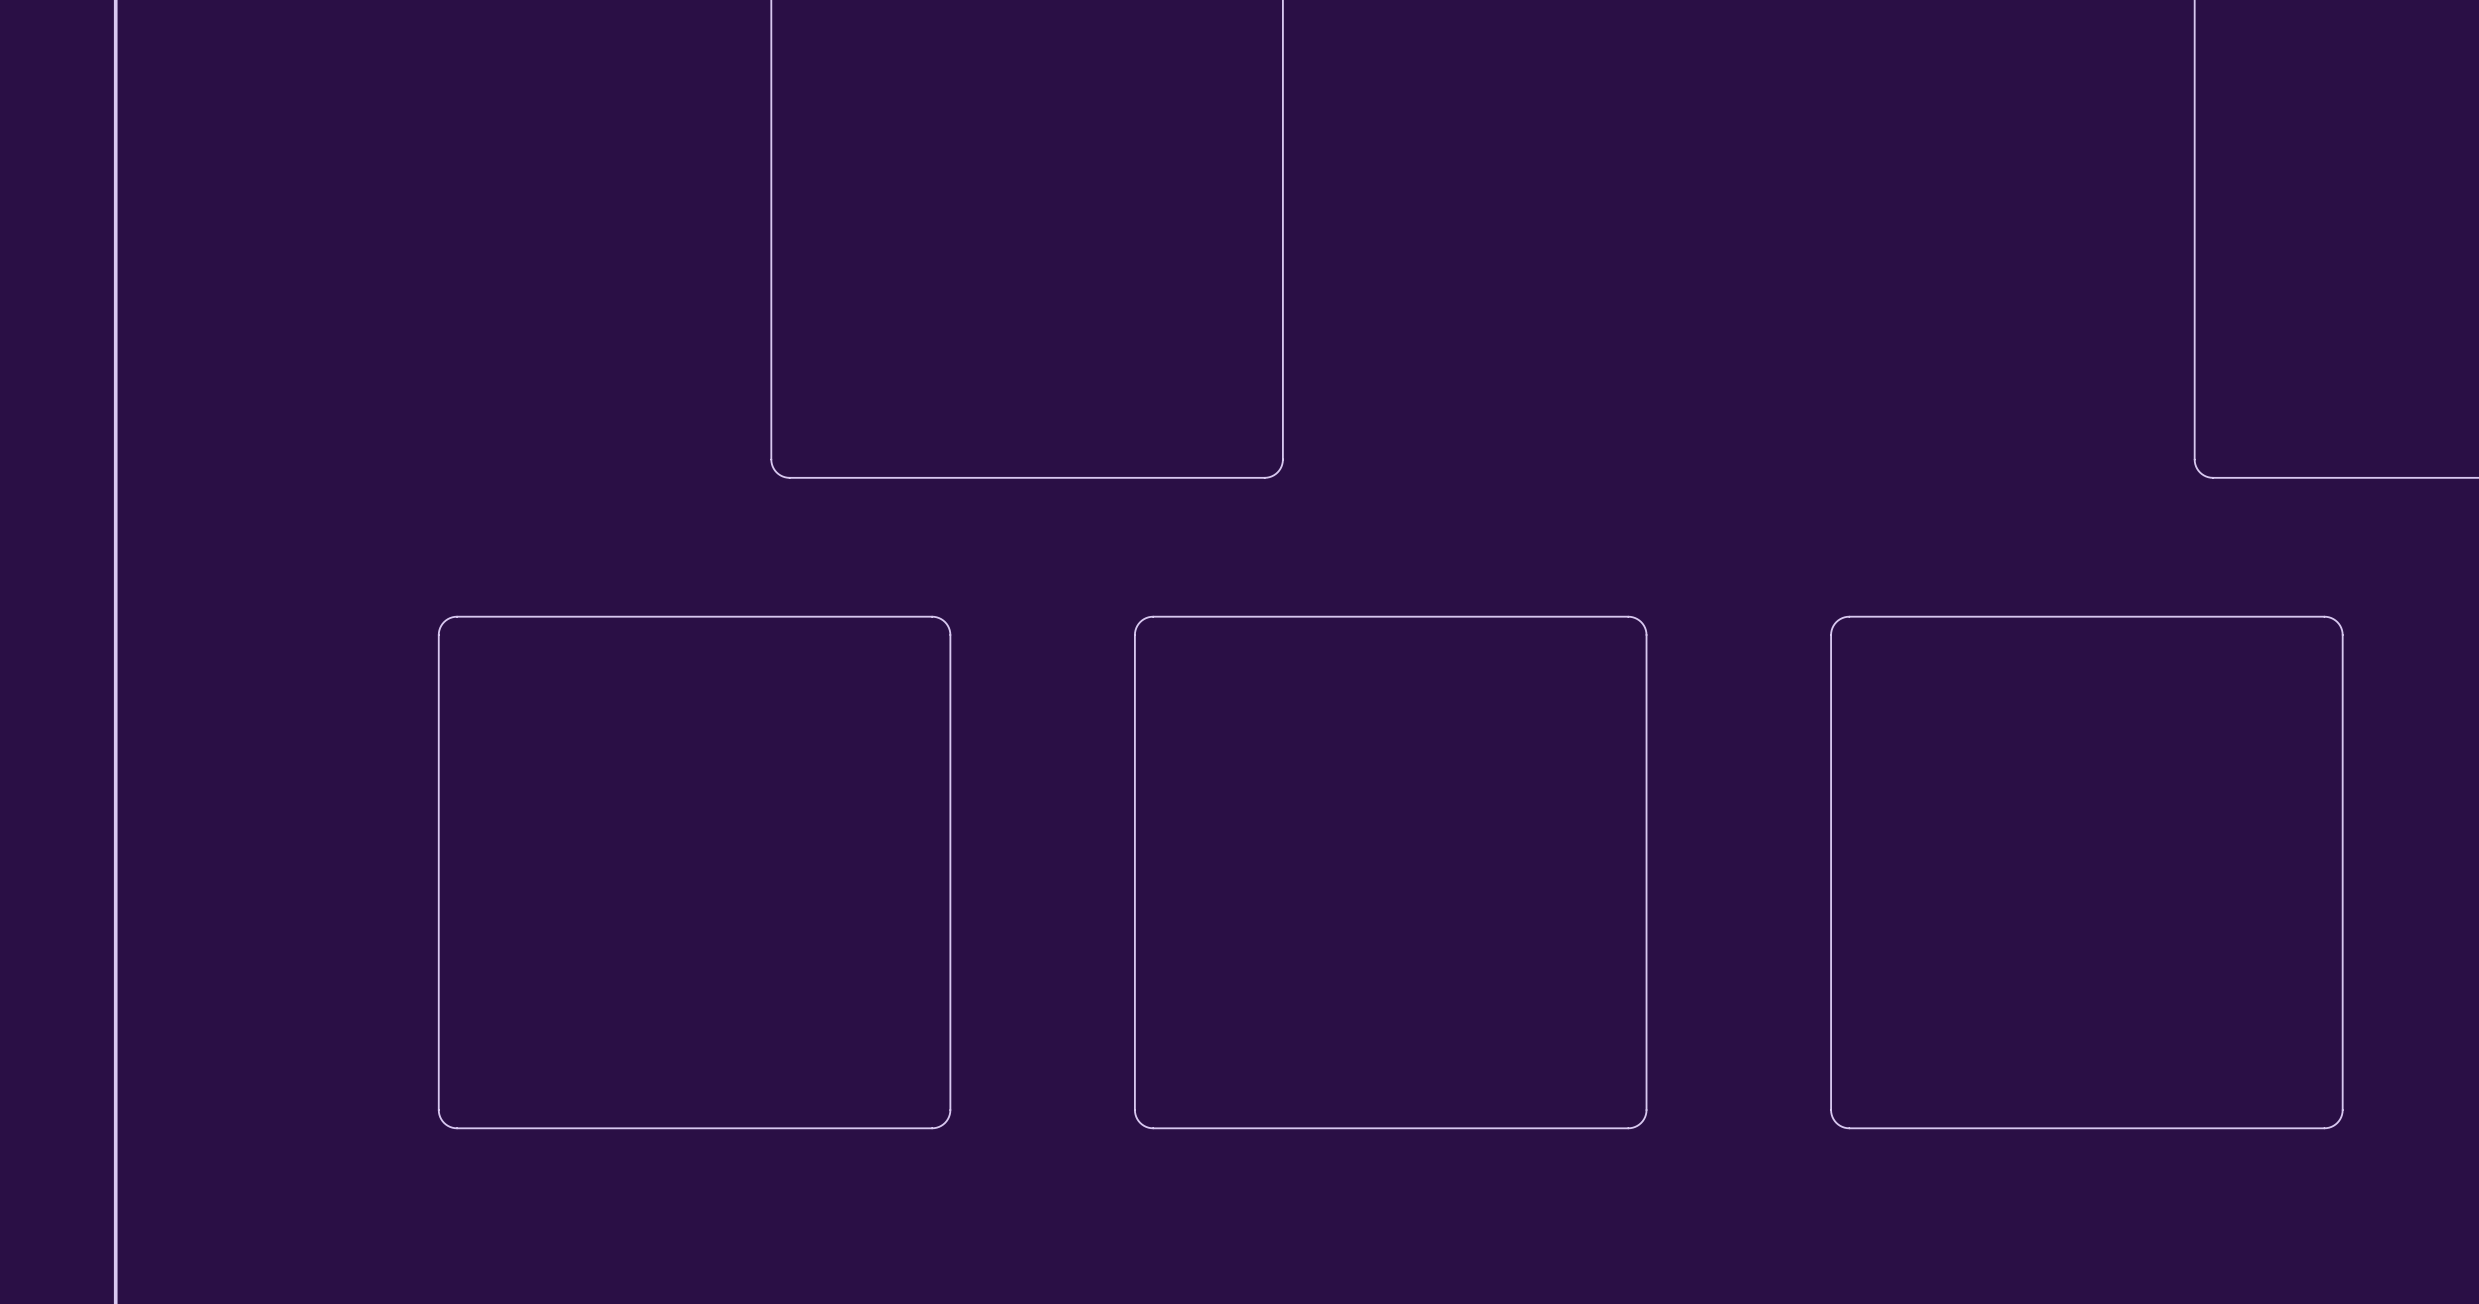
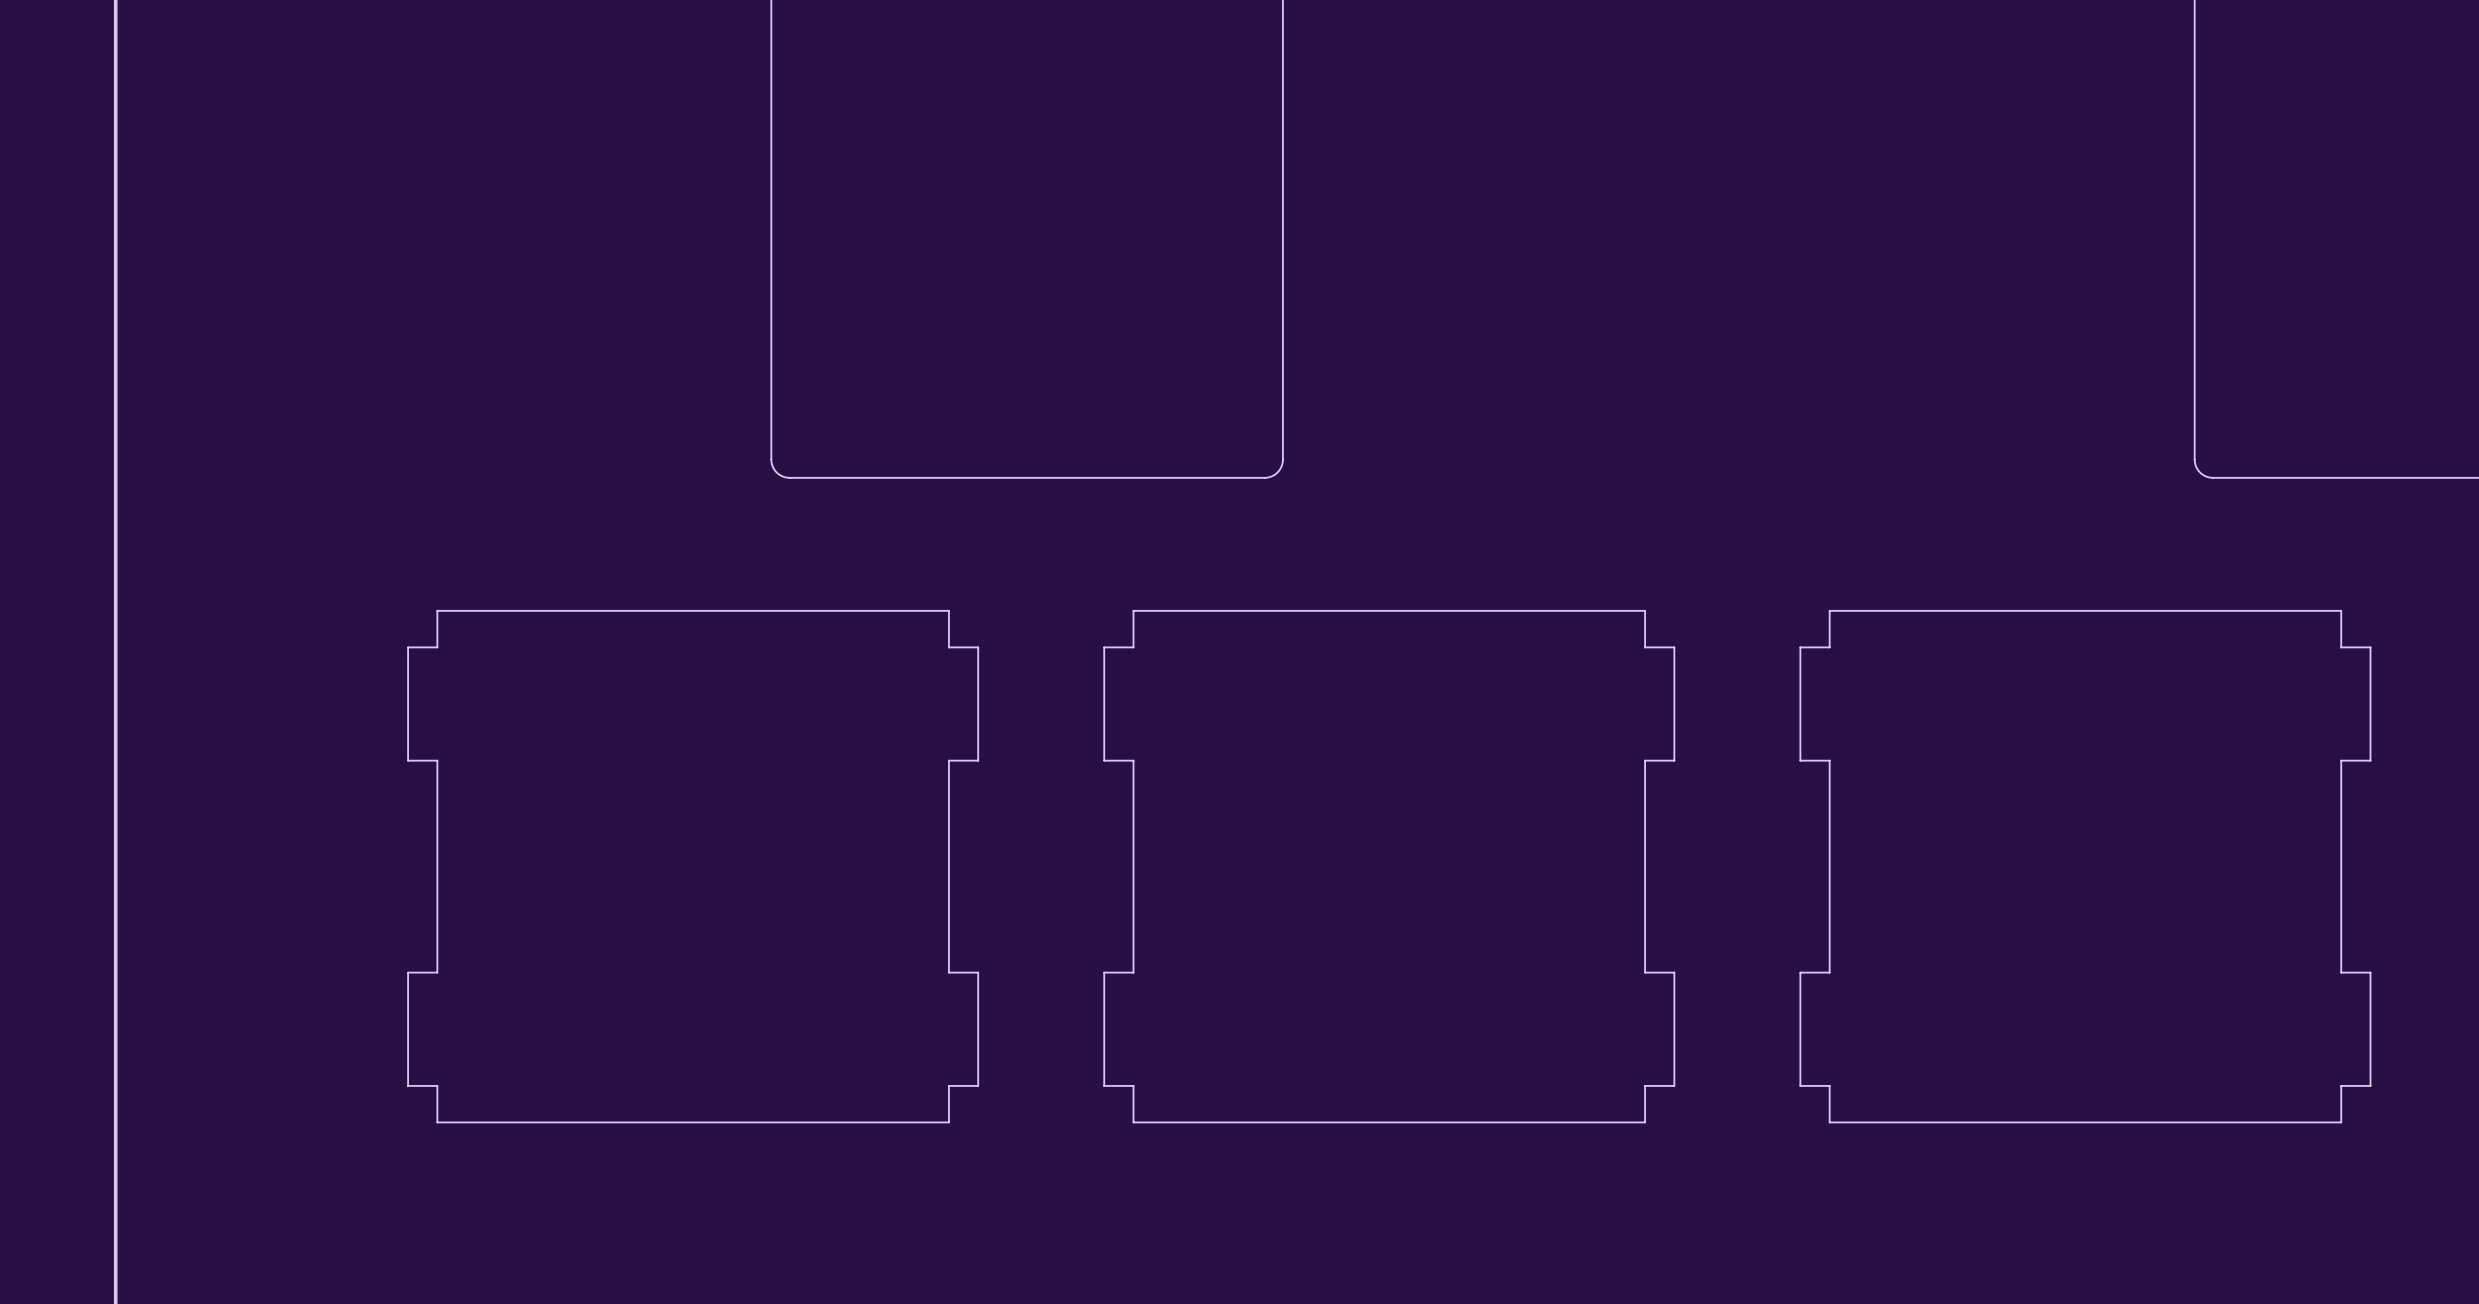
board edge: (457, 616) (932, 616) (945, 622) (950, 634) (950, 1110) (945, 1122) (932, 1128) (457, 1128) (444, 1122) (438, 1110) (438, 634) (444, 622) (457, 616) -> (437, 610) (437, 647) (408, 647) (408, 760) (437, 760) (437, 972) (408, 972) (408, 1085) (437, 1085) (437, 1122) (948, 1122) (948, 1085) (978, 1085) (978, 972) (948, 972) (948, 760) (978, 760) (978, 647) (948, 647) (948, 610) (437, 610)
board edge: (1153, 616) (1628, 616) (1641, 622) (1646, 634) (1646, 1110) (1641, 1122) (1628, 1128) (1153, 1128) (1140, 1122) (1134, 1110) (1134, 634) (1140, 622) (1153, 616) -> (1133, 610) (1133, 647) (1104, 647) (1104, 760) (1133, 760) (1133, 972) (1104, 972) (1104, 1085) (1133, 1085) (1133, 1122) (1645, 1122) (1645, 1085) (1674, 1085) (1674, 972) (1645, 972) (1645, 760) (1674, 760) (1674, 647) (1645, 647) (1645, 610) (1133, 610)
board edge: (1849, 616) (2324, 616) (2337, 622) (2342, 634) (2342, 1110) (2337, 1122) (2324, 1128) (1849, 1128) (1836, 1122) (1831, 1110) (1831, 634) (1836, 622) (1849, 616) -> (1829, 610) (1829, 647) (1800, 647) (1800, 760) (1829, 760) (1829, 972) (1800, 972) (1800, 1085) (1829, 1085) (1829, 1122) (2341, 1122) (2341, 1085) (2370, 1085) (2370, 972) (2341, 972) (2341, 760) (2370, 760) (2370, 647) (2341, 647) (2341, 610) (1829, 610)

